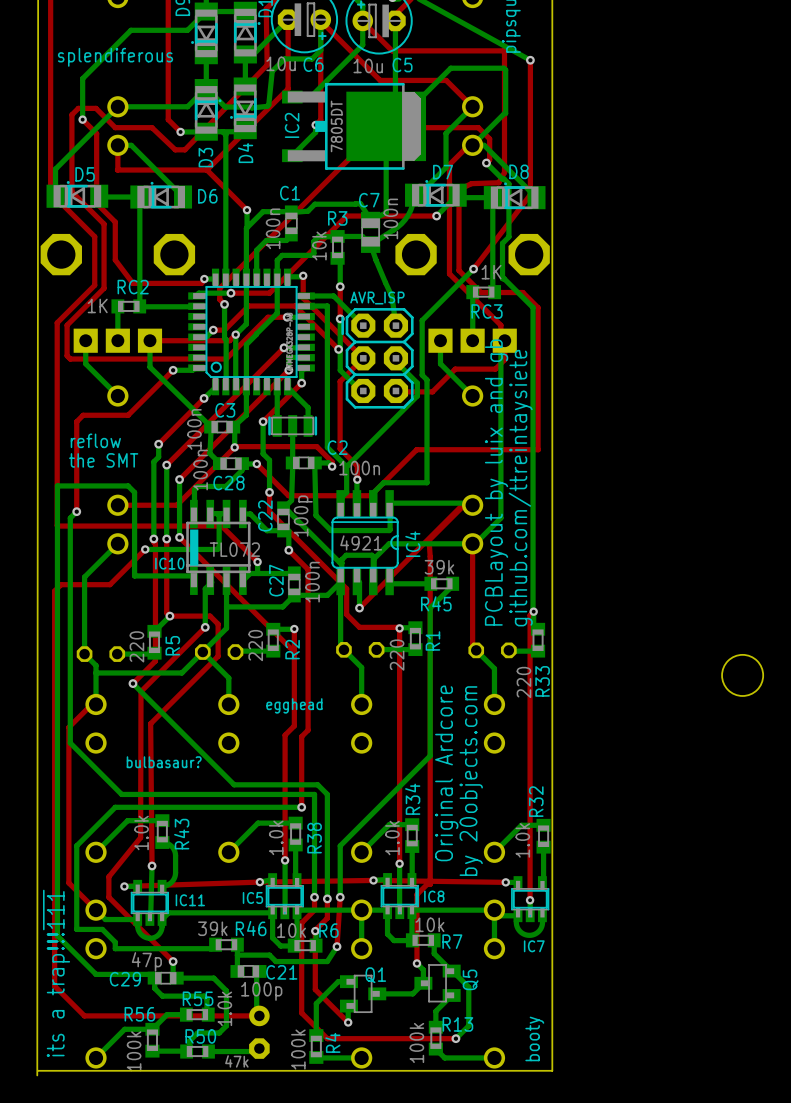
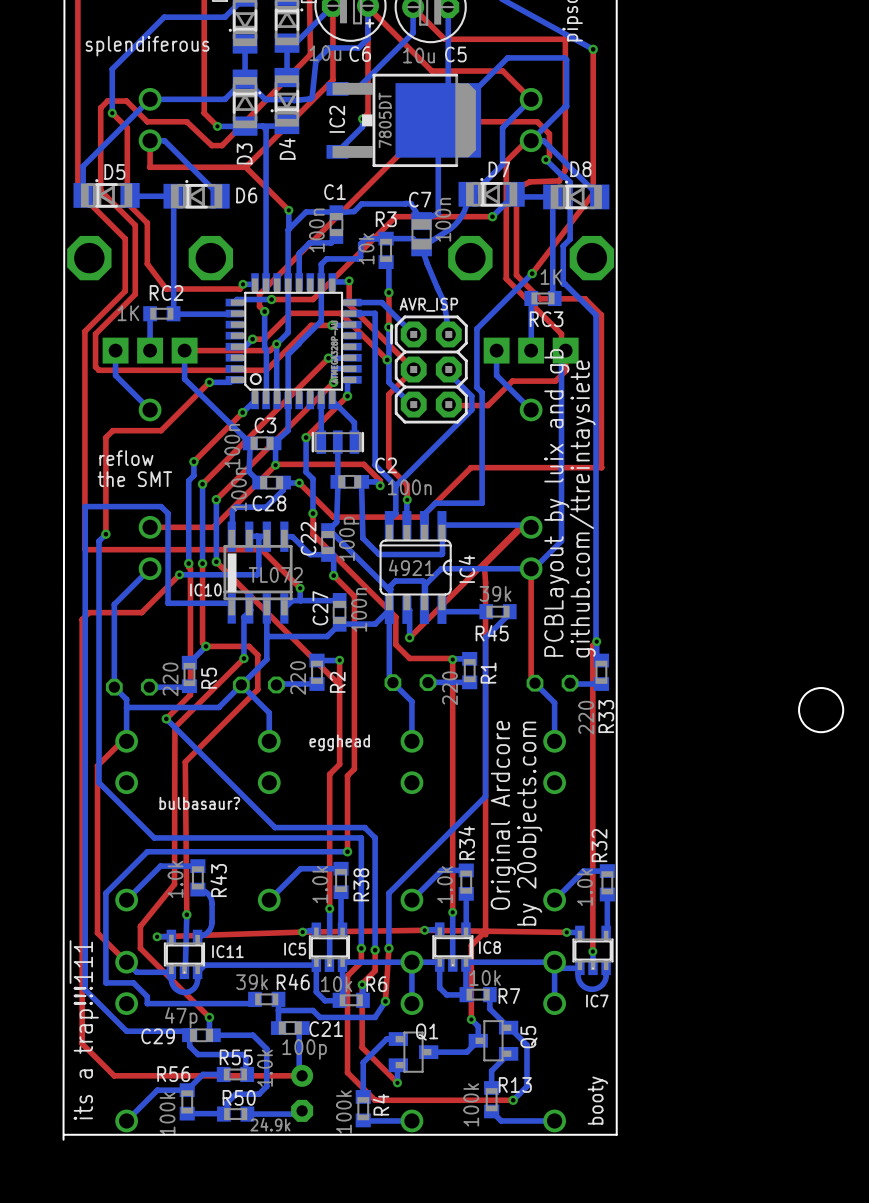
R50 value: 47k (236, 1061) -> 24.9k (270, 1124)

